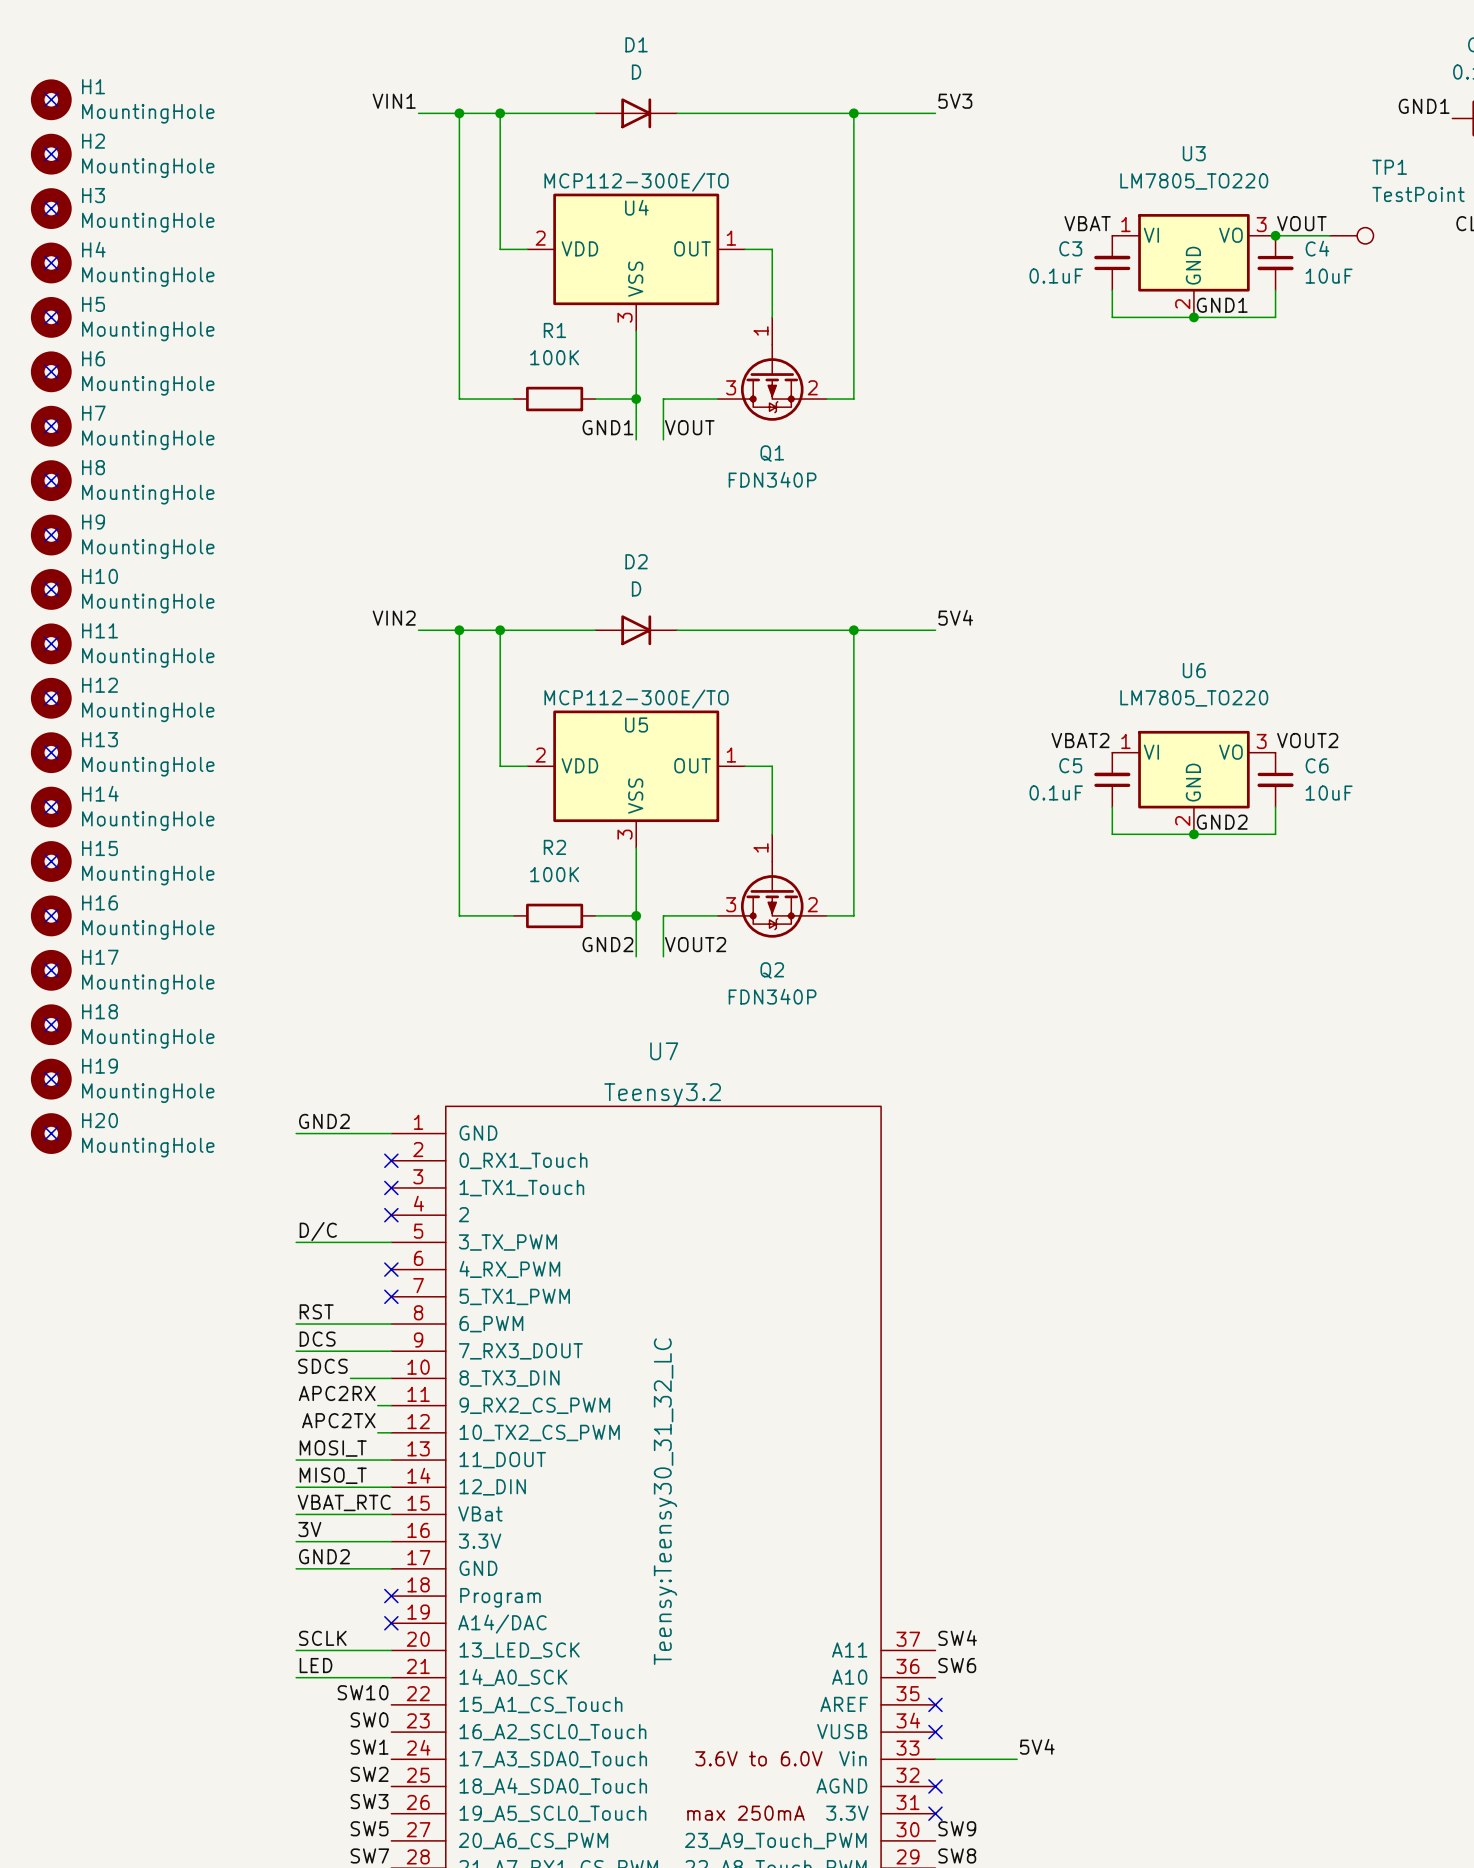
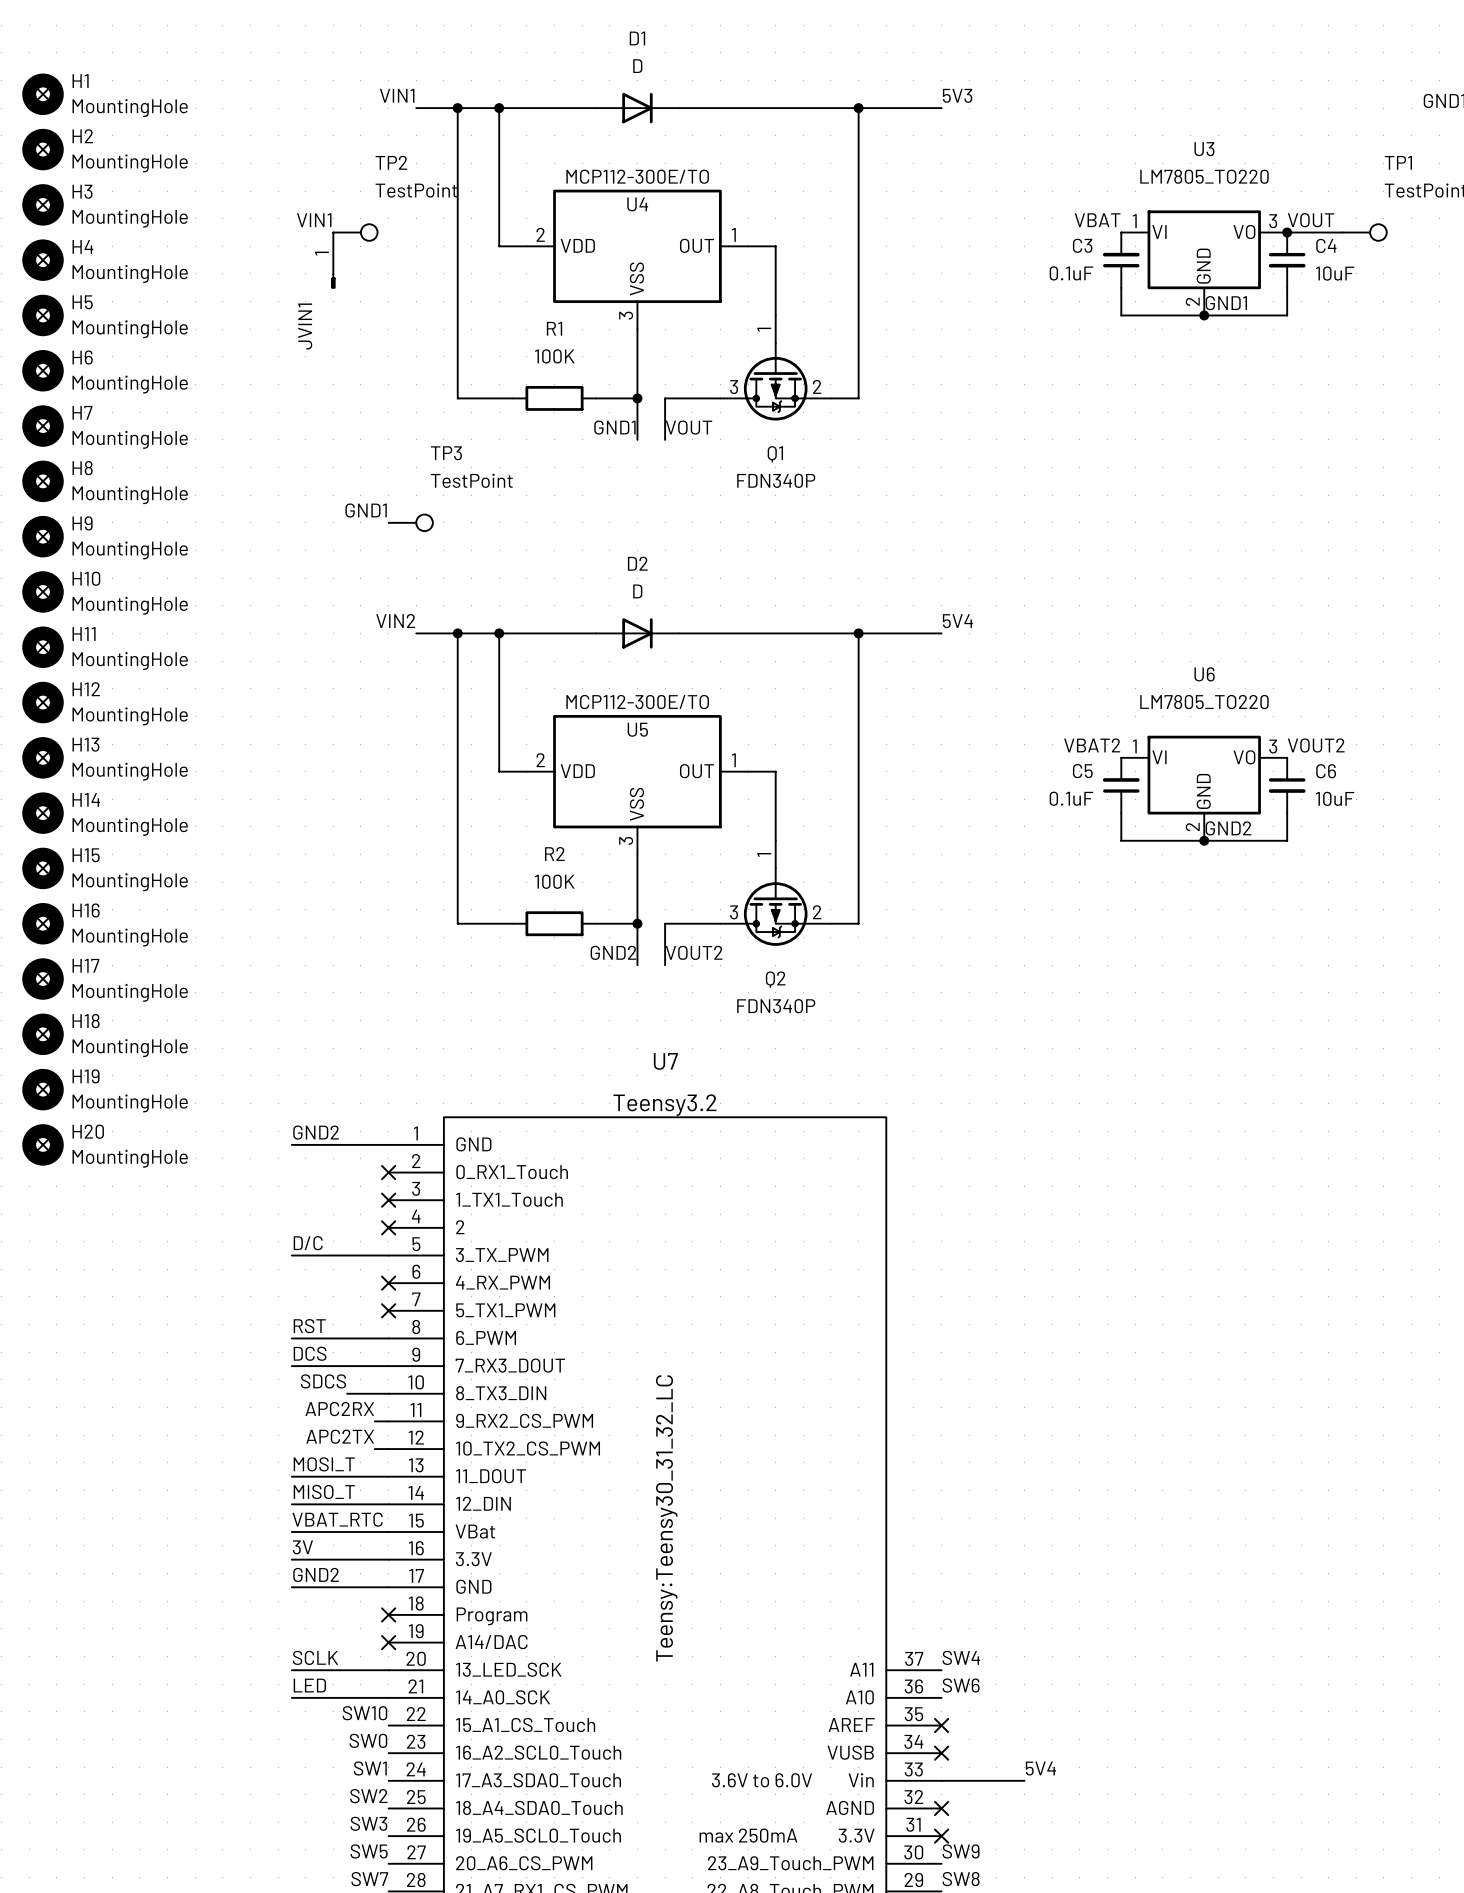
label: none -> VIN1 (314, 220)
TP2: none -> TestPoint (355, 232)
JVIN1: none -> (333, 260)
label: none -> GND1 (366, 510)
TP3: none -> TestPoint (410, 522)

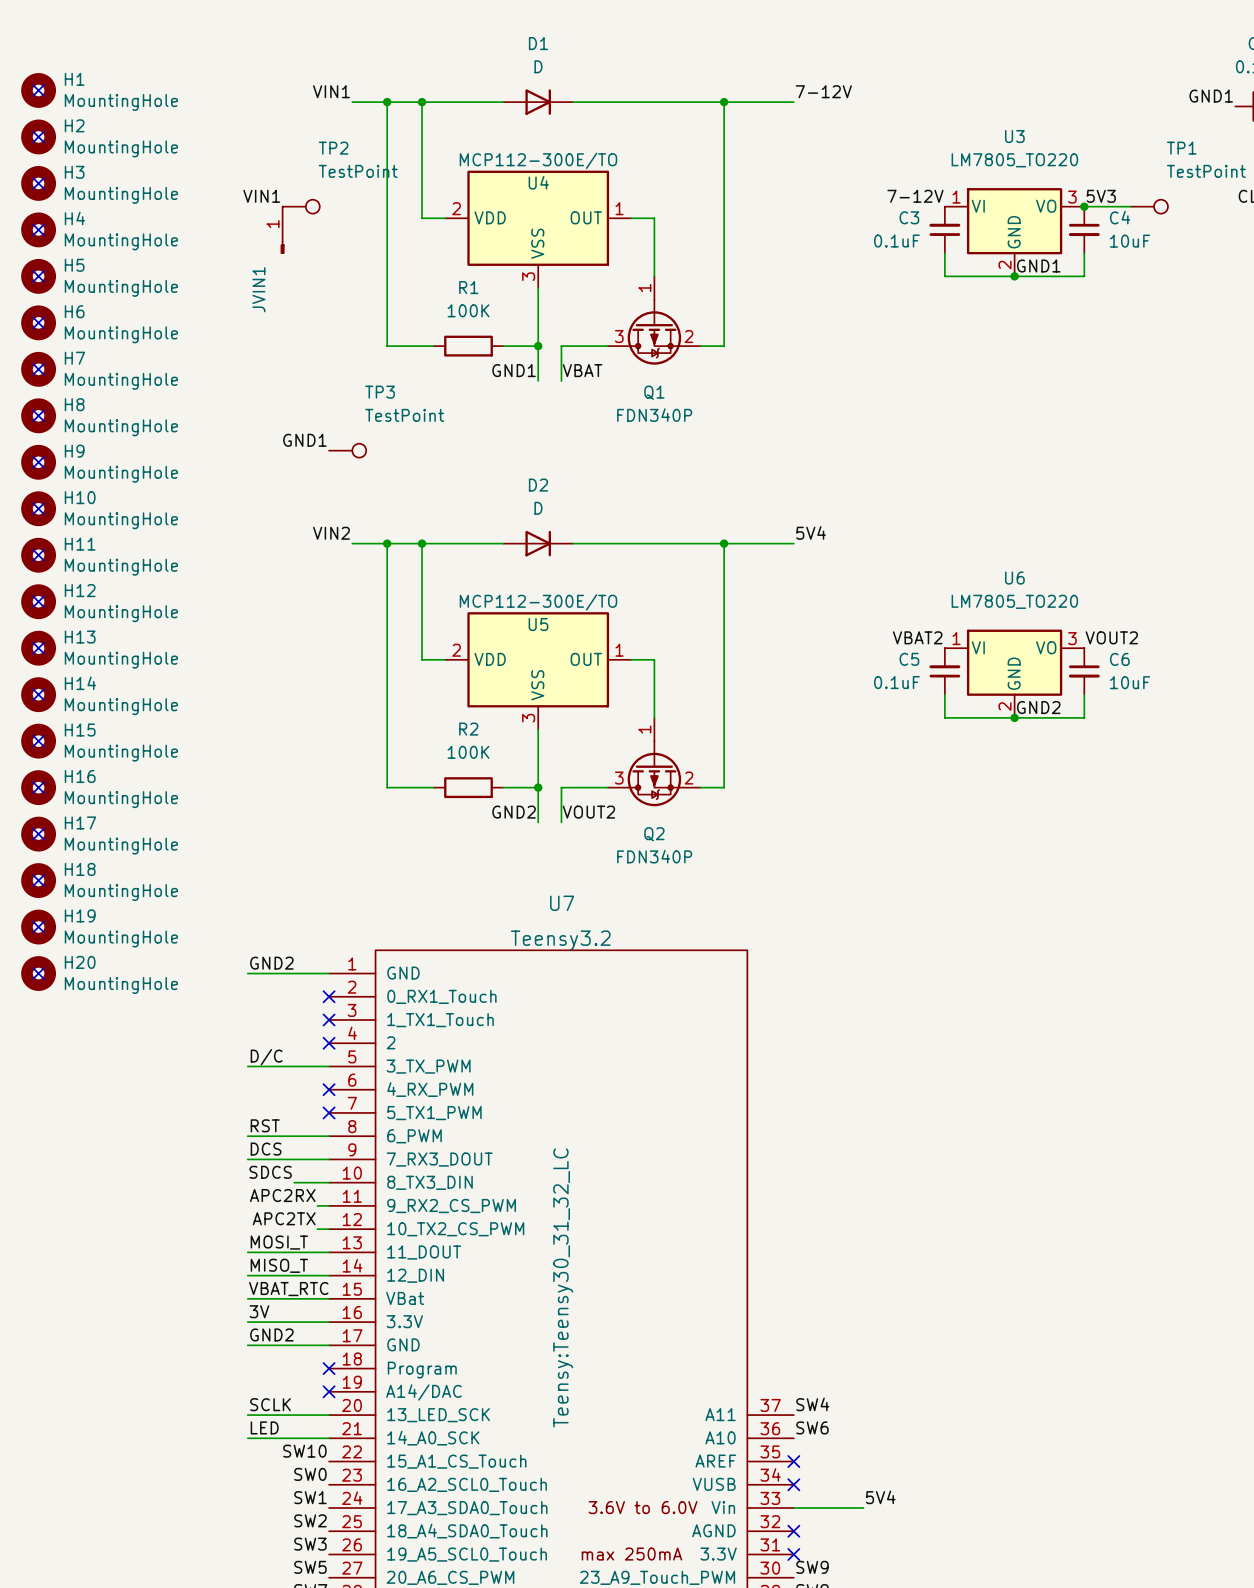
label: 5V3 (957, 95) -> 7-12V (823, 91)
label: VBAT (1097, 220) -> 7-12V (915, 196)
label: VOUT (1311, 220) -> 5V3 (1101, 196)
label: VOUT (689, 427) -> VBAT (582, 370)

